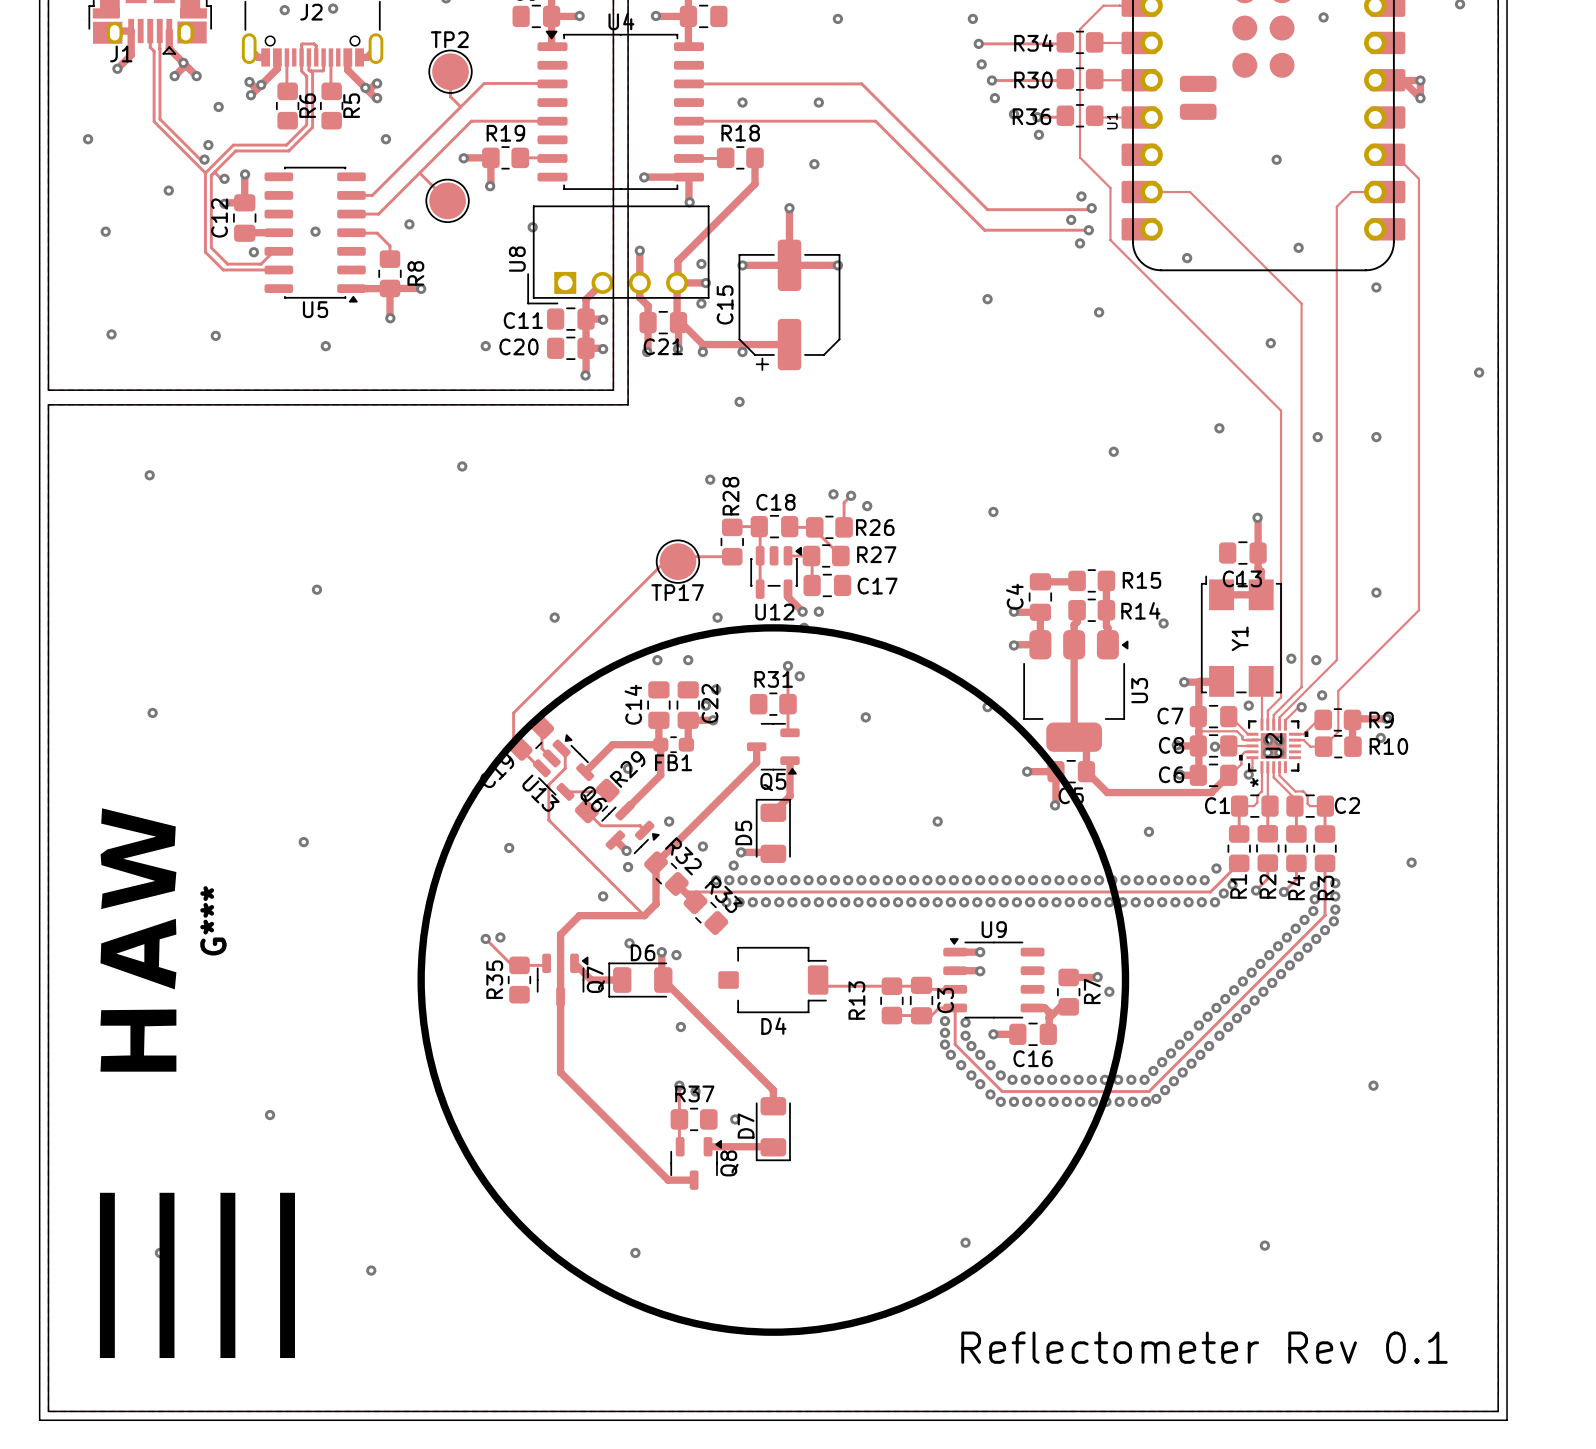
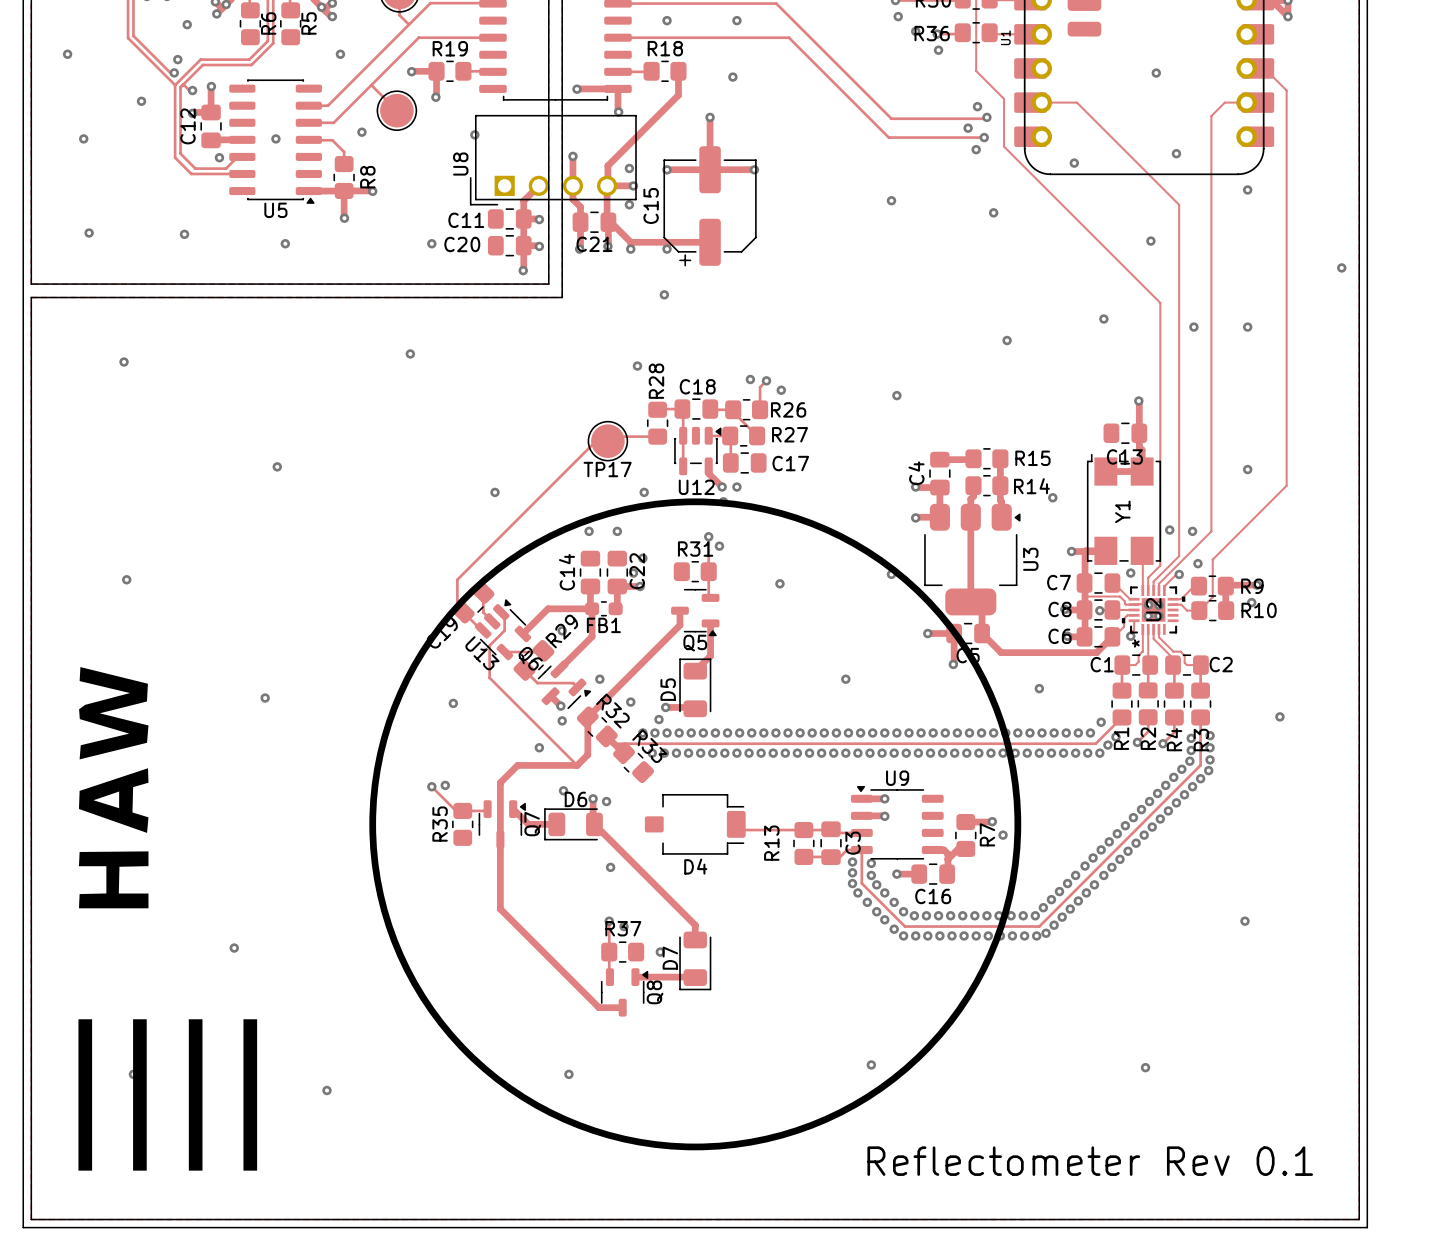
G***: (197, 1083) -> none

